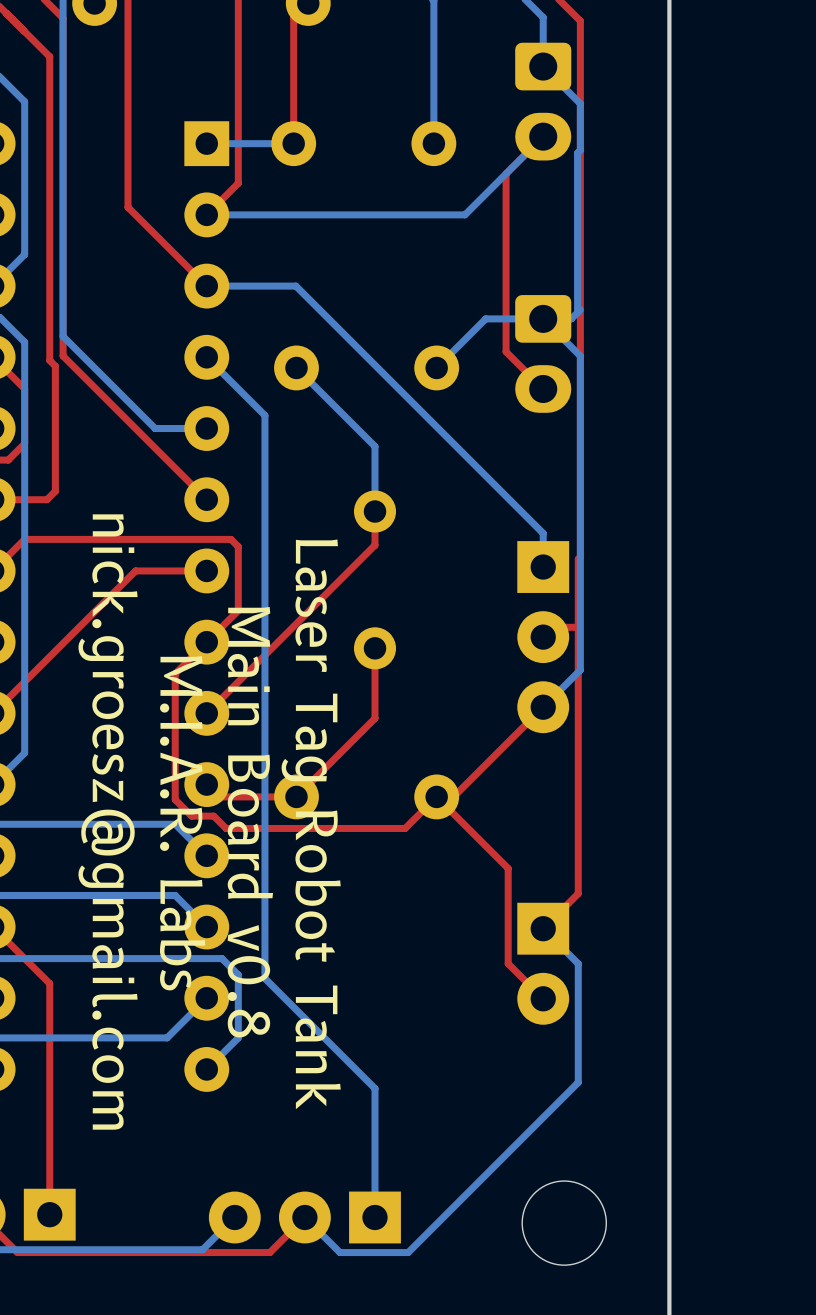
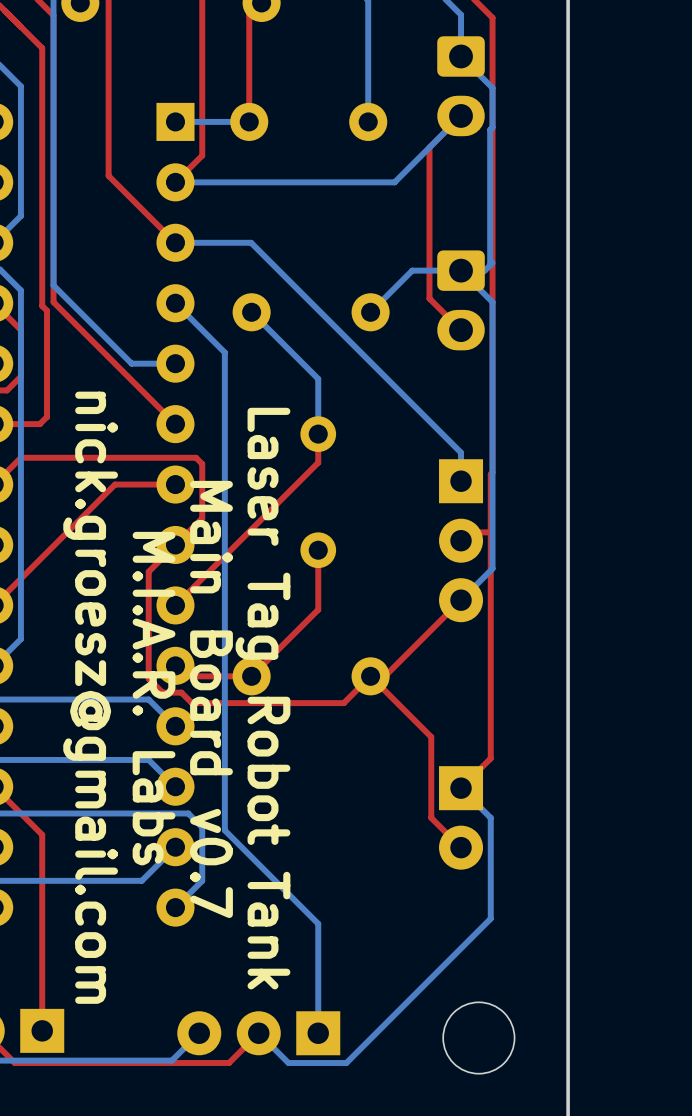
text: Main Board v0.8 (250, 822) -> Main Board v0.7 (211, 699)

